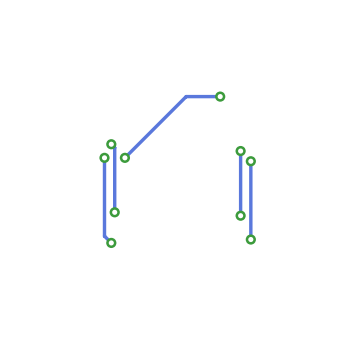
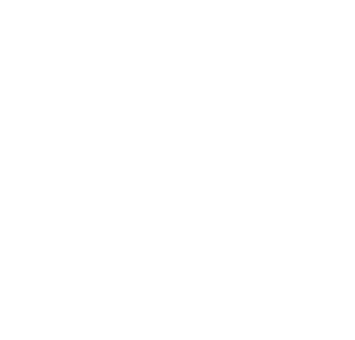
track: (220, 96) (186, 96) (124, 157) -> none
via: (220, 96) -> none
track: (111, 144) (114, 147) (114, 212) -> none
via: (111, 144) -> none
track: (240, 151) (240, 215) -> none
via: (240, 151) -> none
track: (104, 157) (104, 236) (111, 242) -> none
via: (104, 157) -> none
via: (124, 157) -> none
track: (250, 161) (250, 239) -> none
via: (250, 161) -> none
via: (114, 212) -> none
via: (240, 215) -> none
via: (250, 239) -> none
via: (111, 242) -> none

